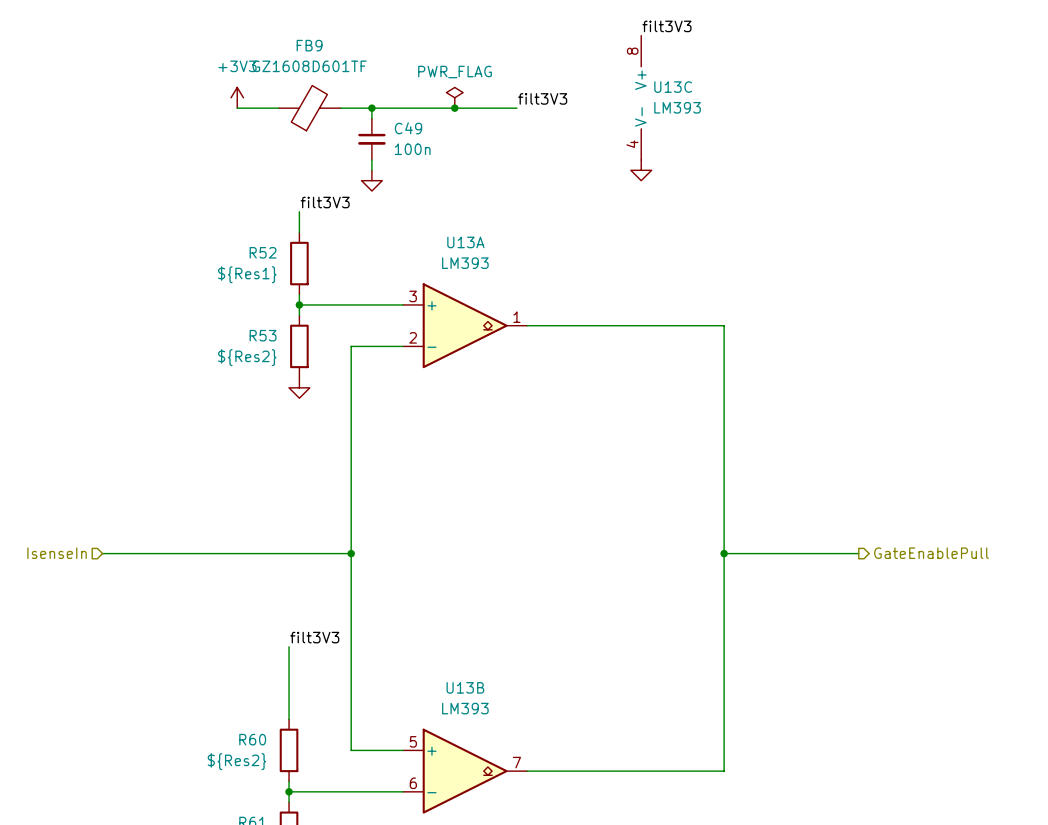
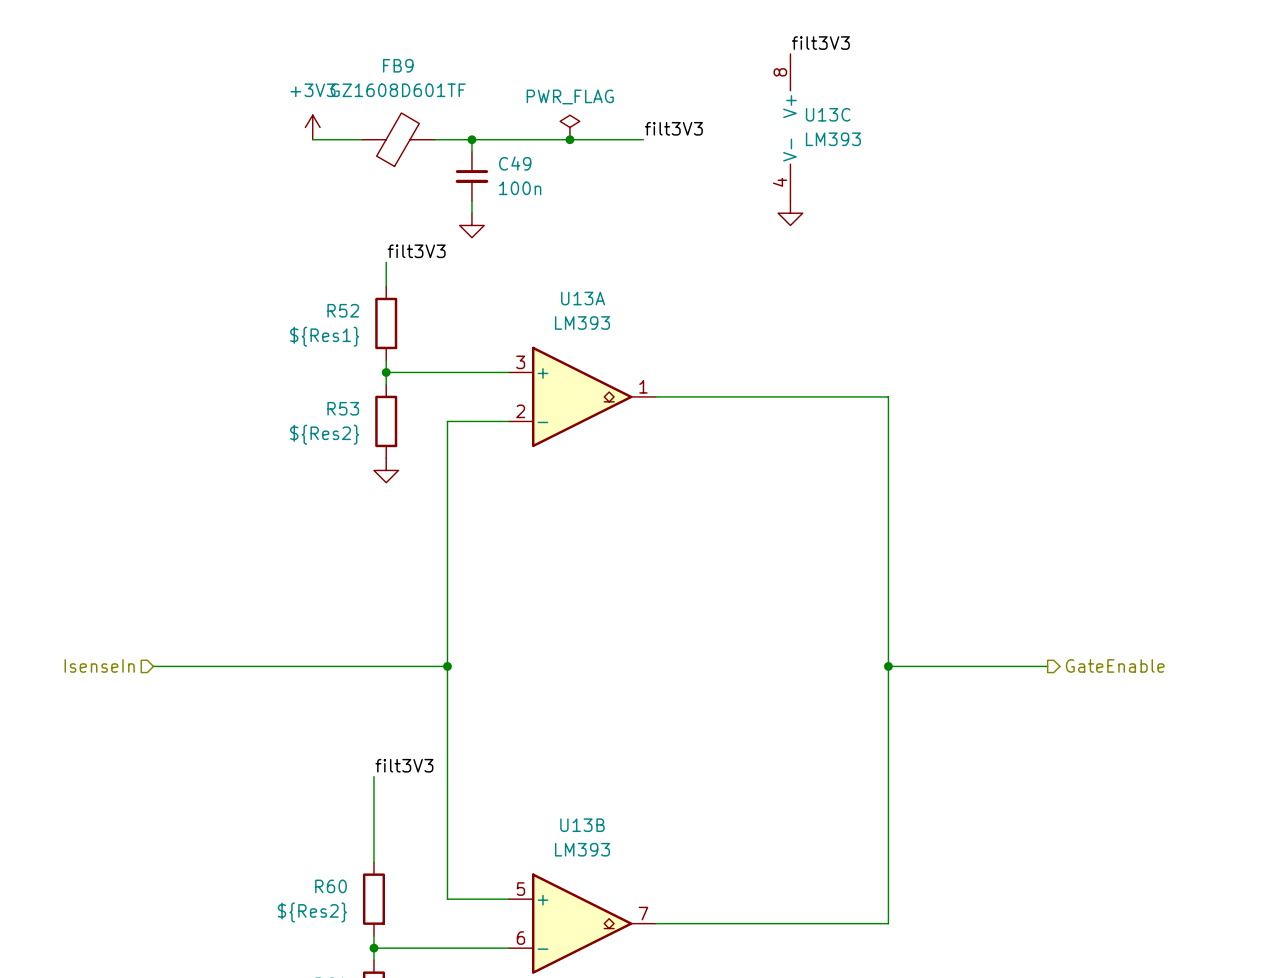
hierarchical label: GateEnablePull (931, 553) -> GateEnable (1115, 665)

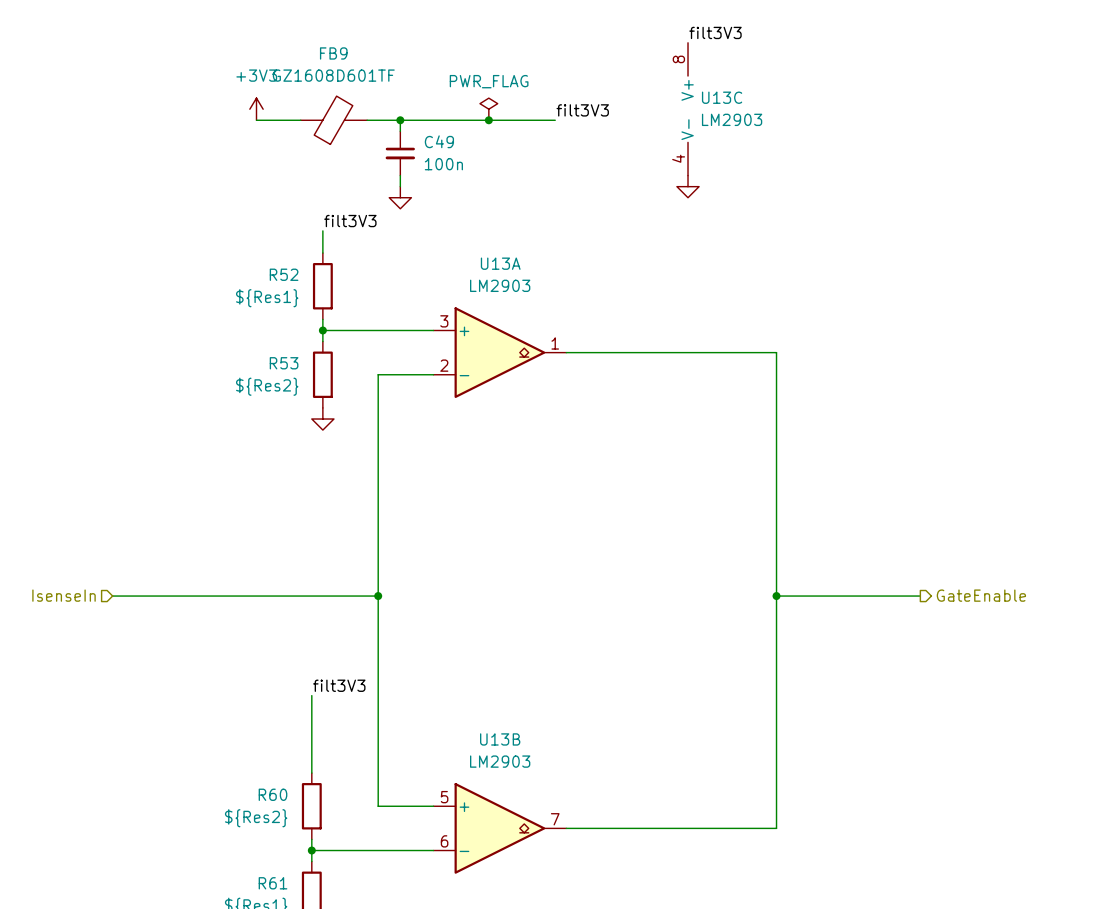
U13C value: LM393 (833, 139) -> LM2903 (732, 119)
U13A value: LM393 (582, 323) -> LM2903 (500, 285)
U13B value: LM393 (582, 849) -> LM2903 (500, 761)

